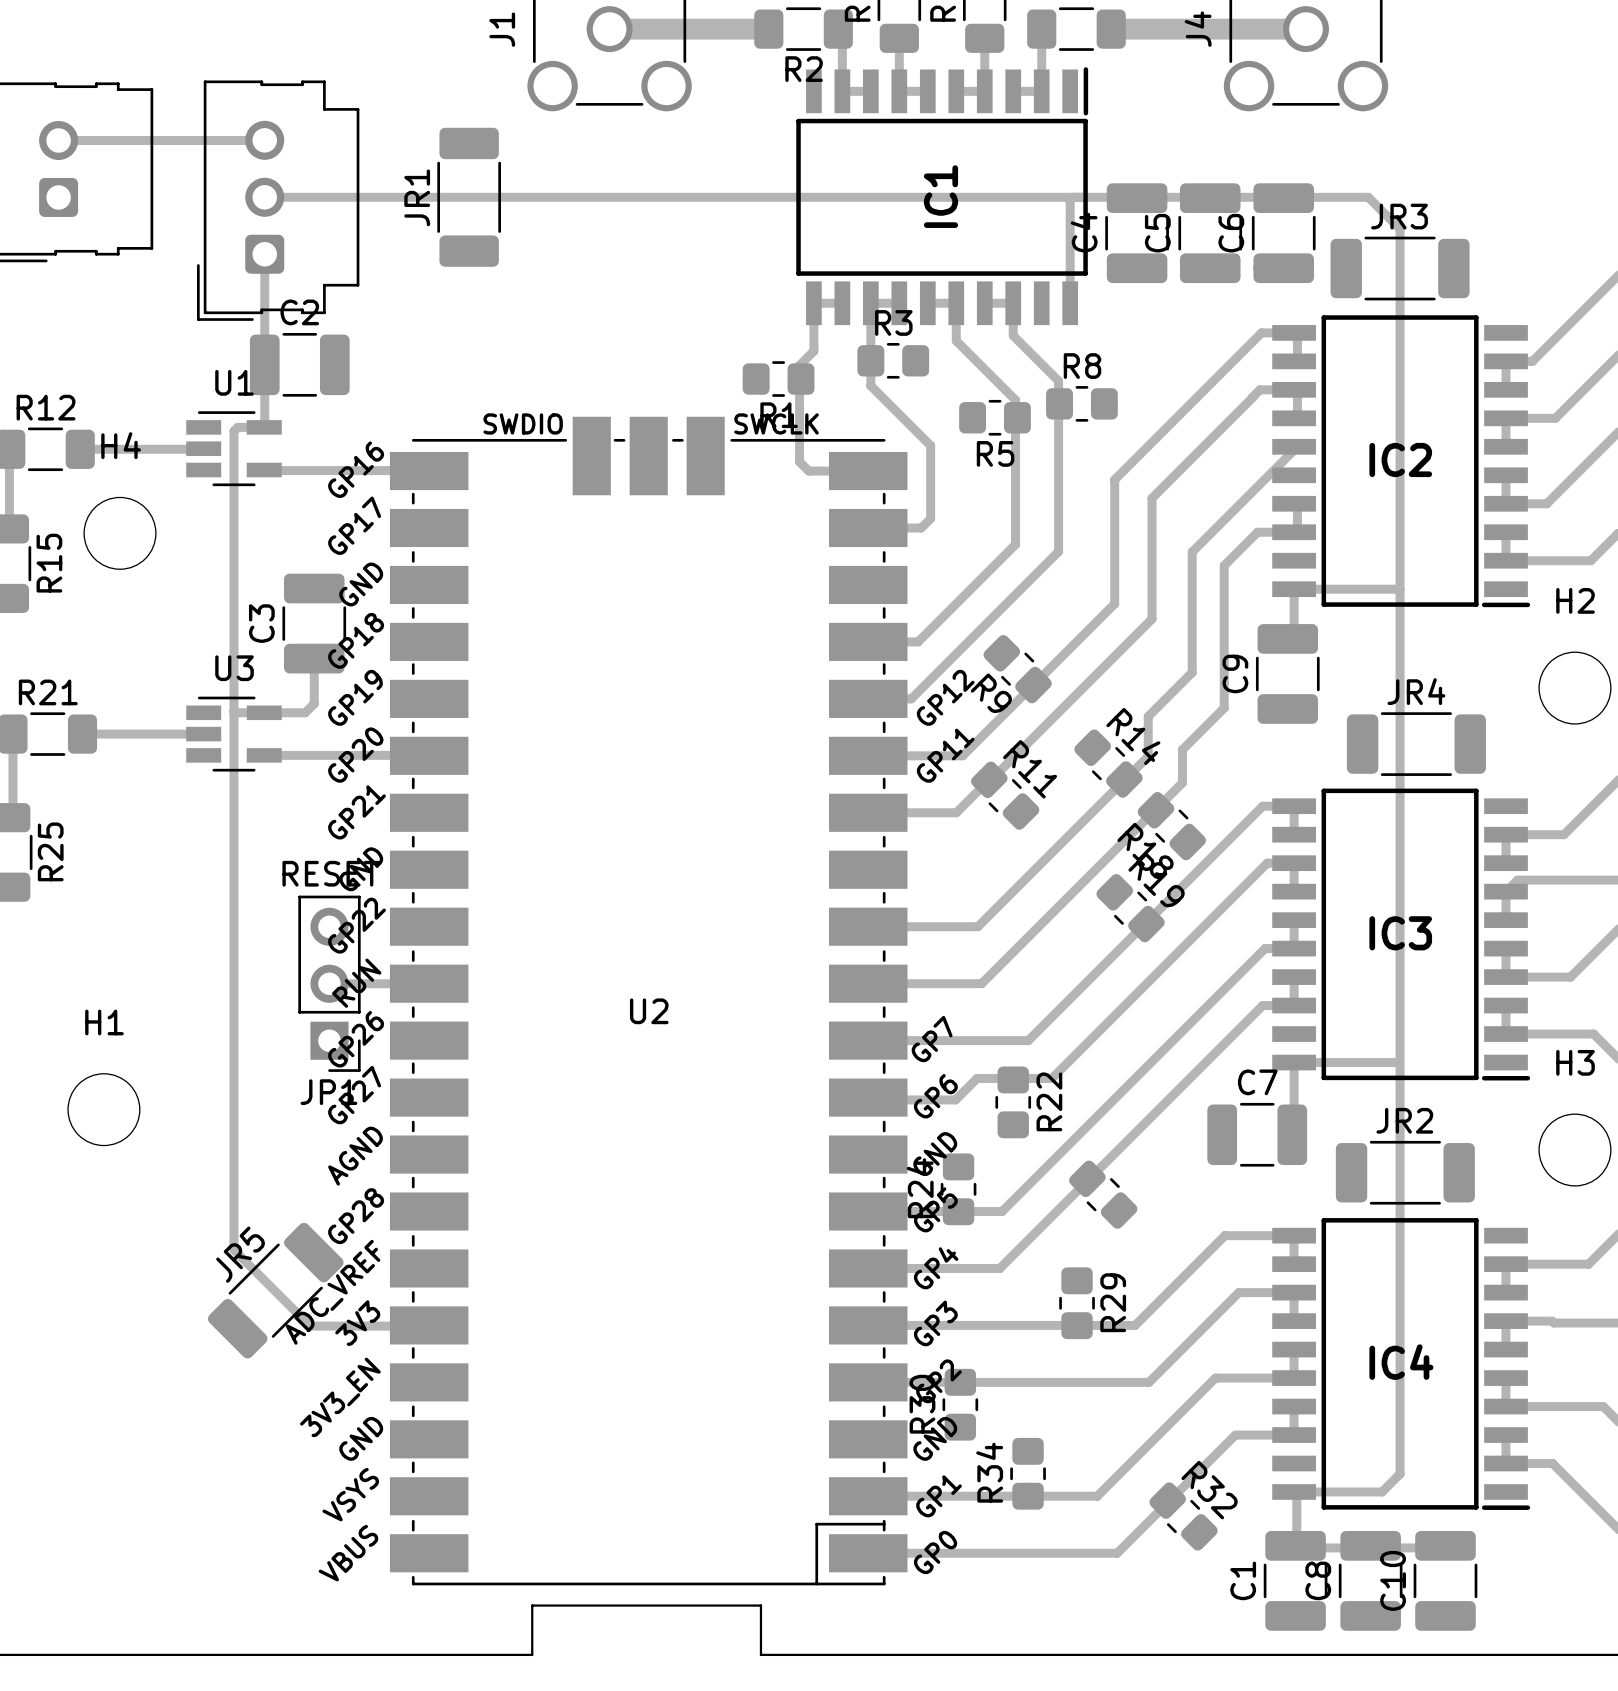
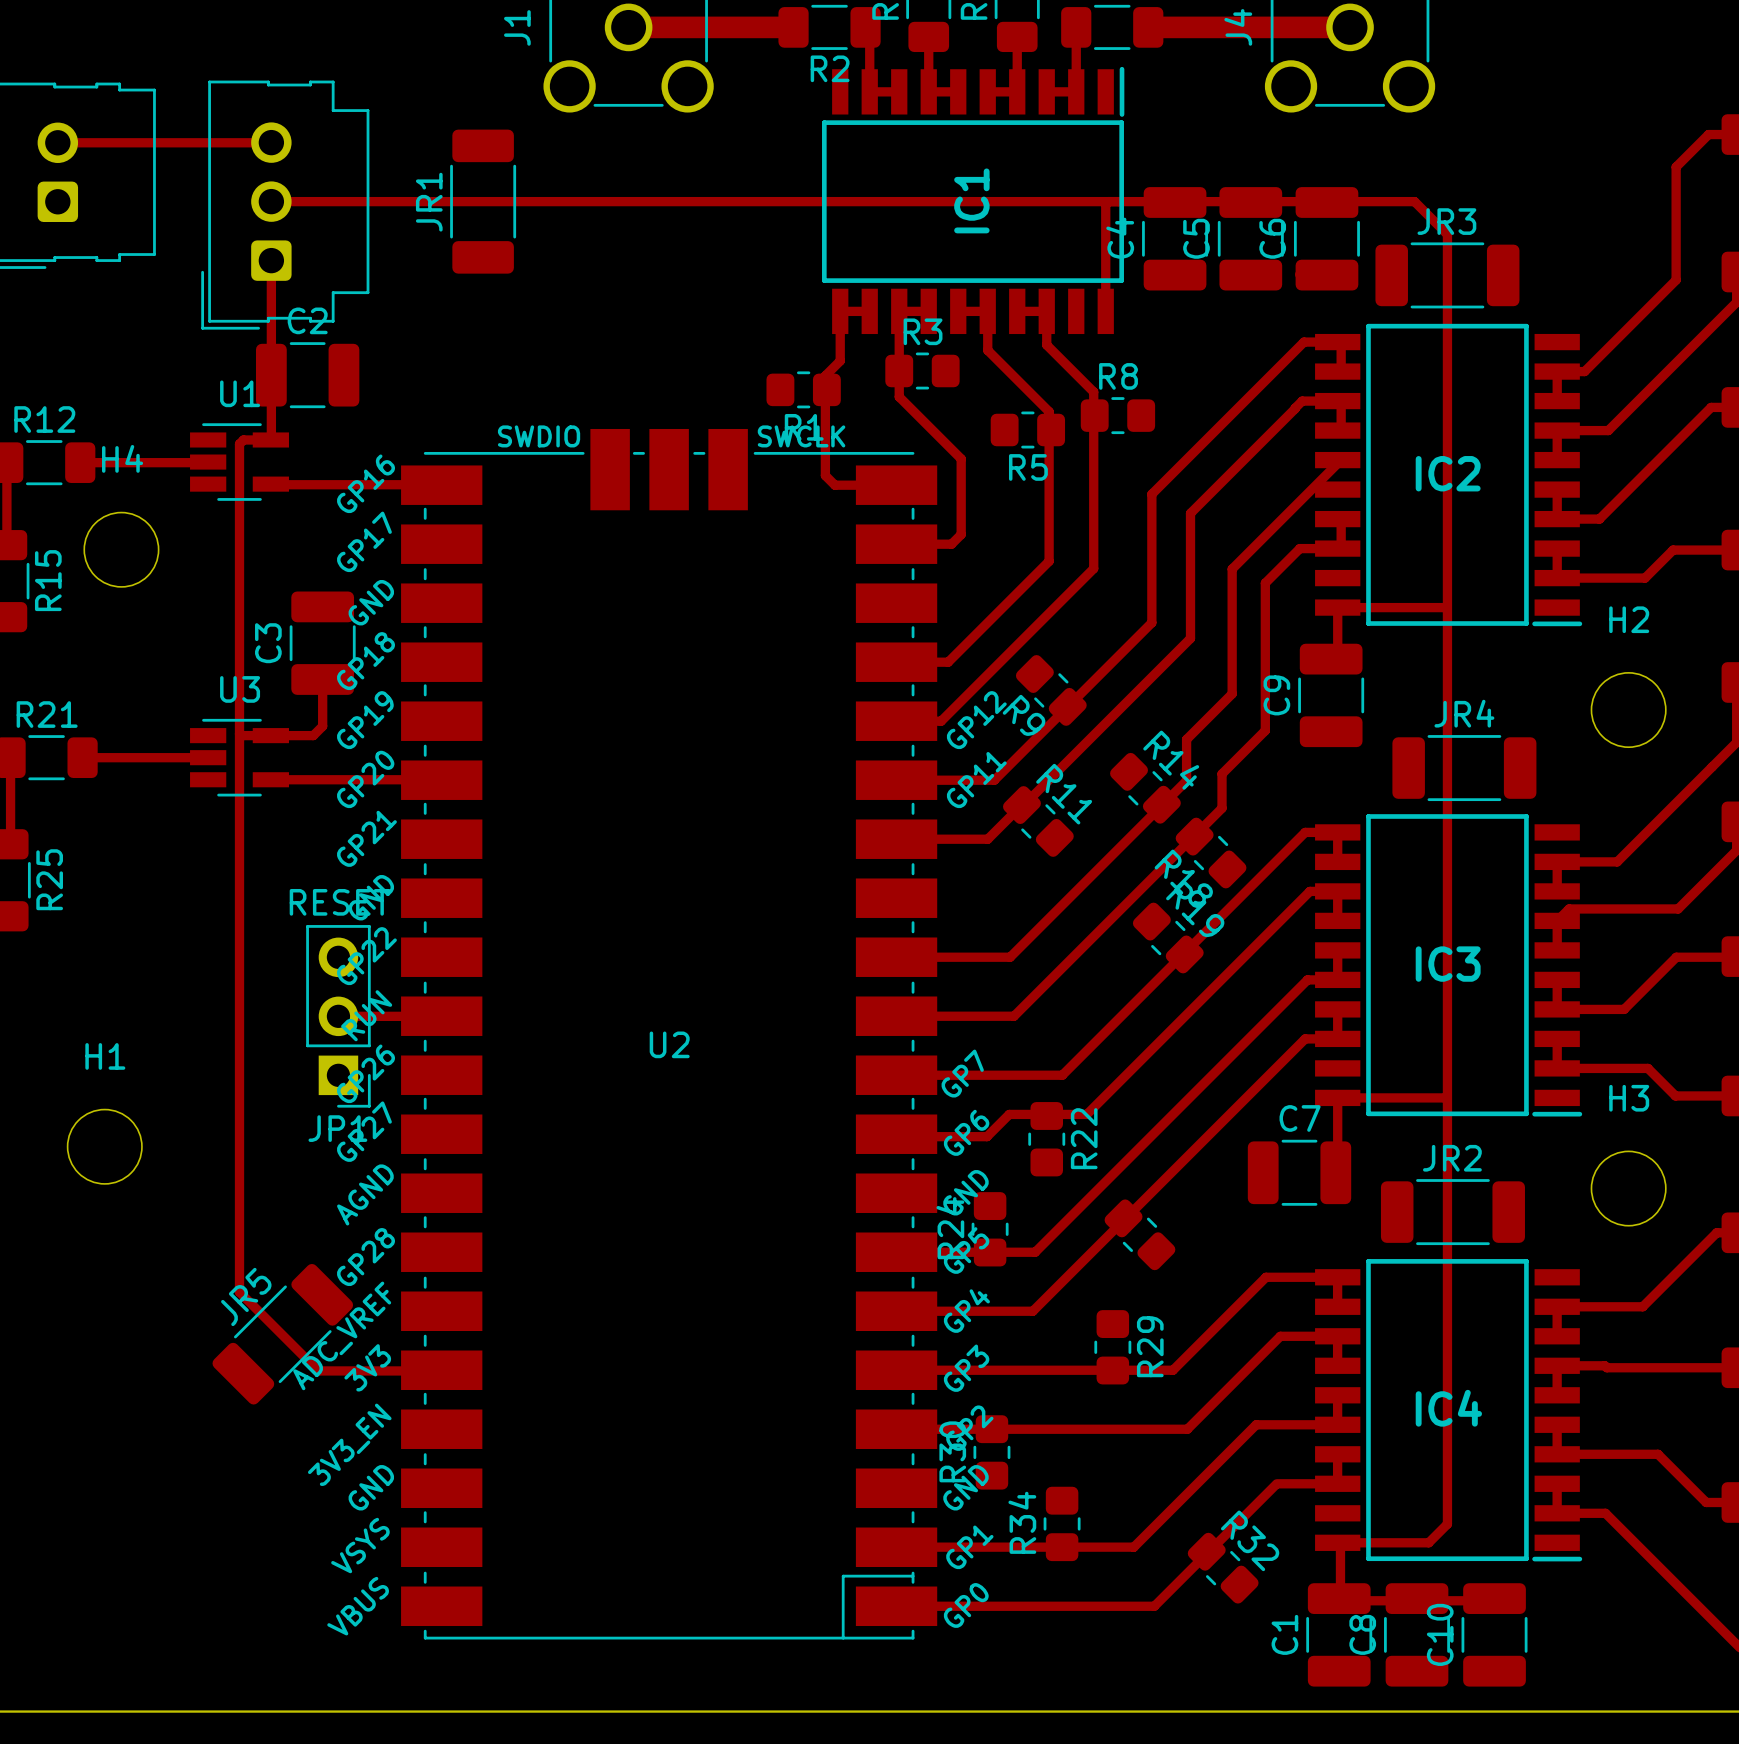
board edge: (532, 1654) (532, 1605) (760, 1605) (760, 1654) -> (548, 1711) (785, 1711)

